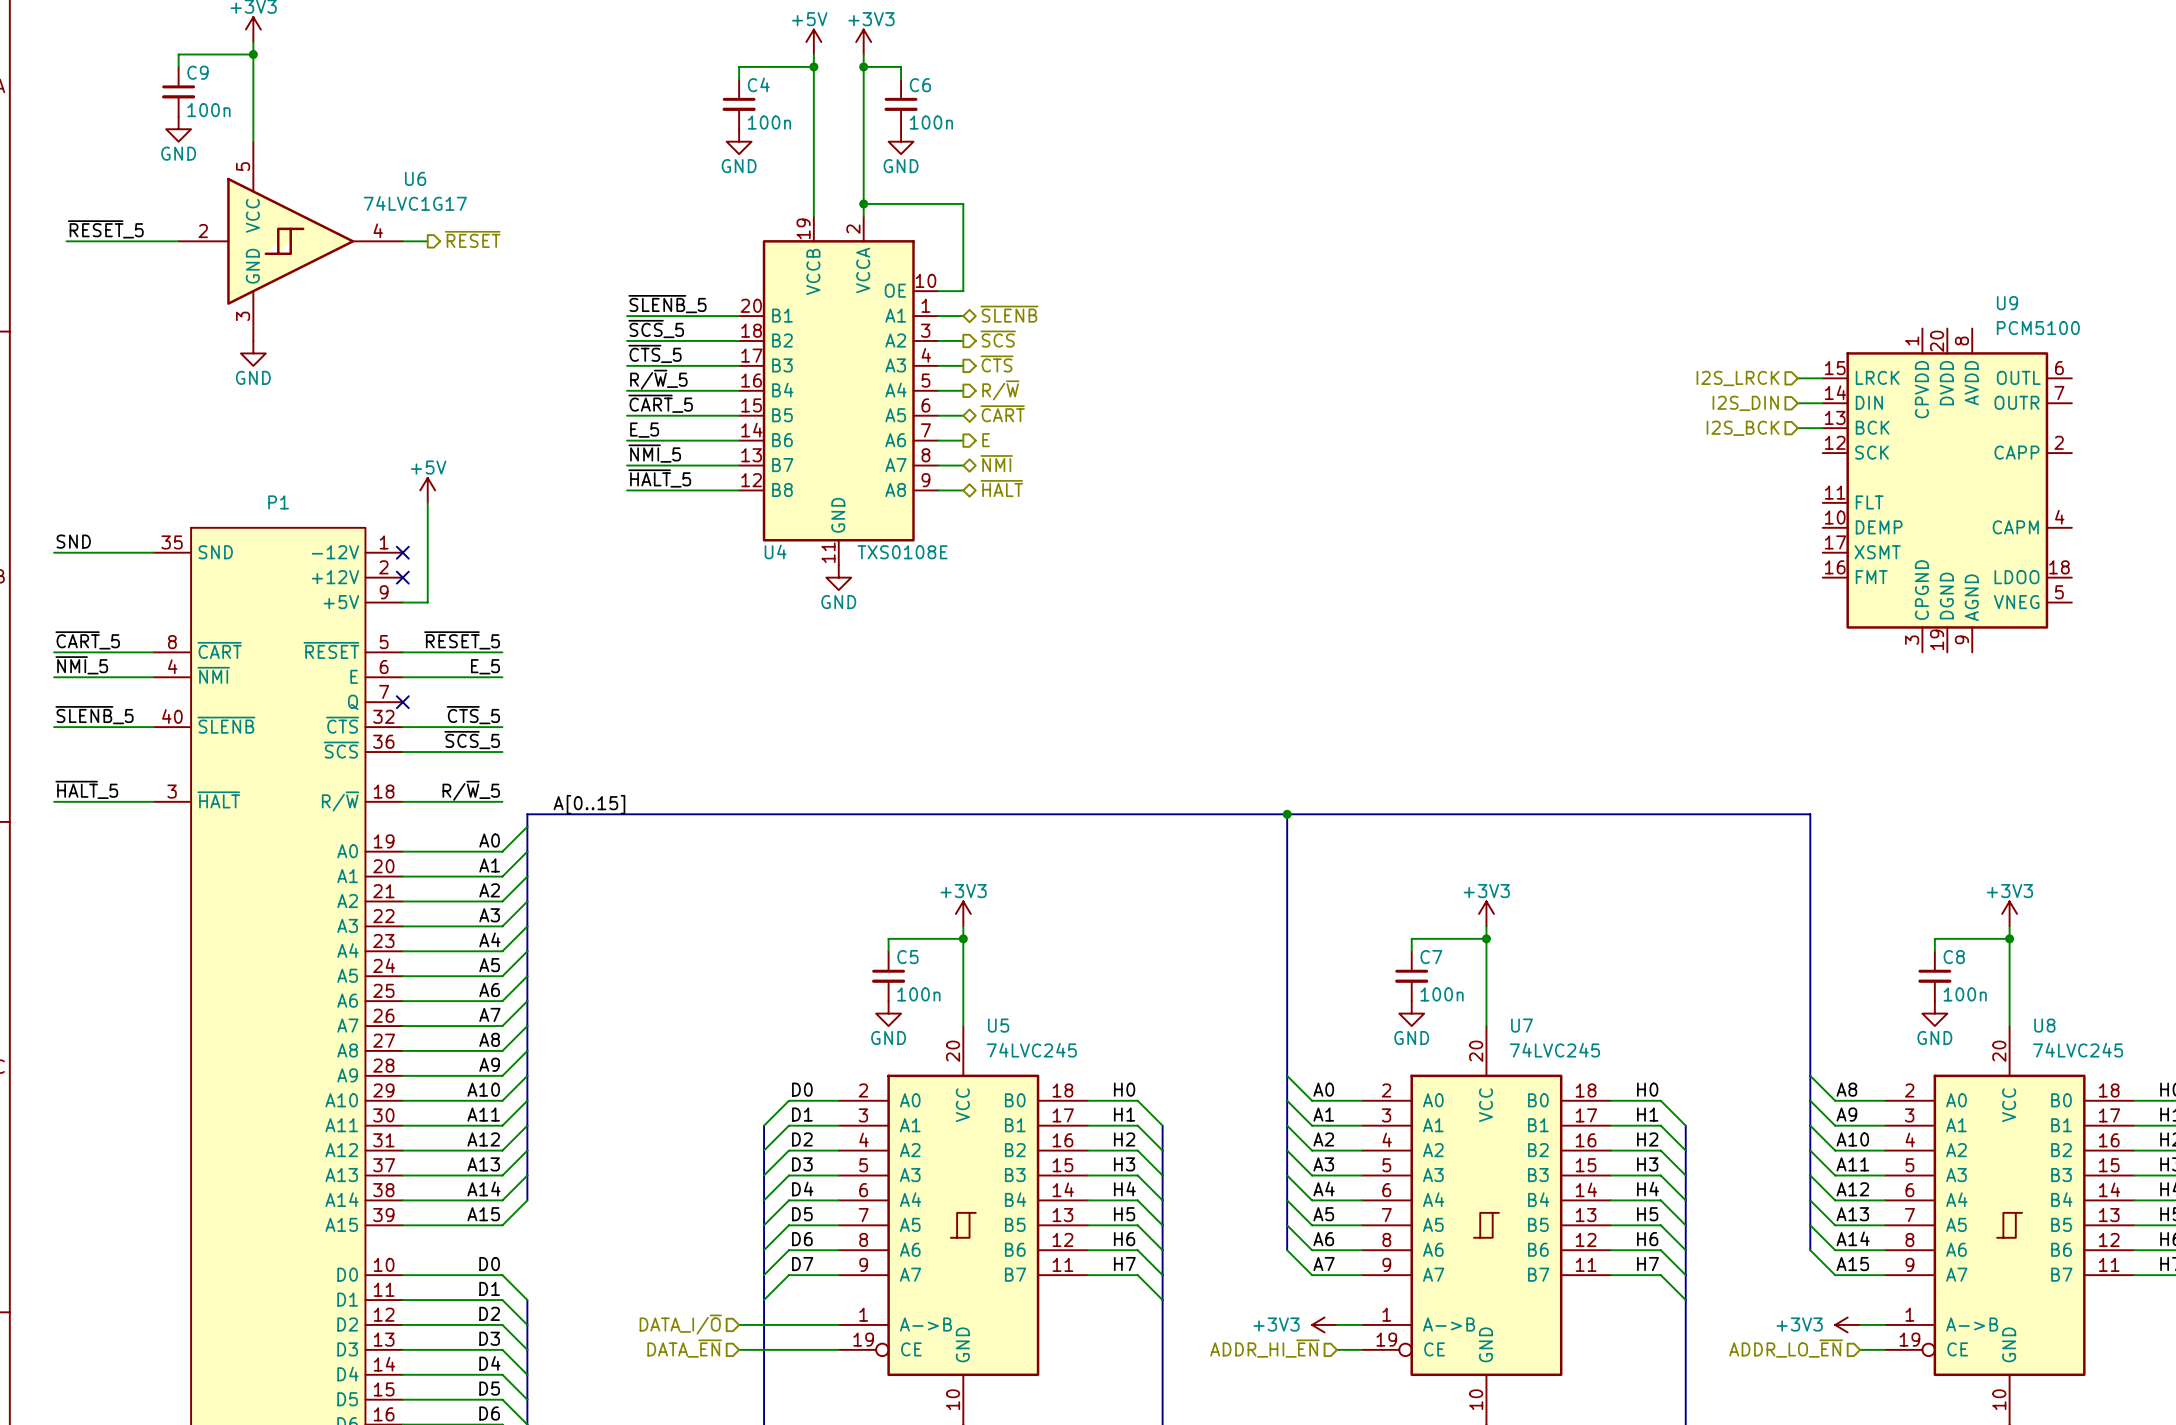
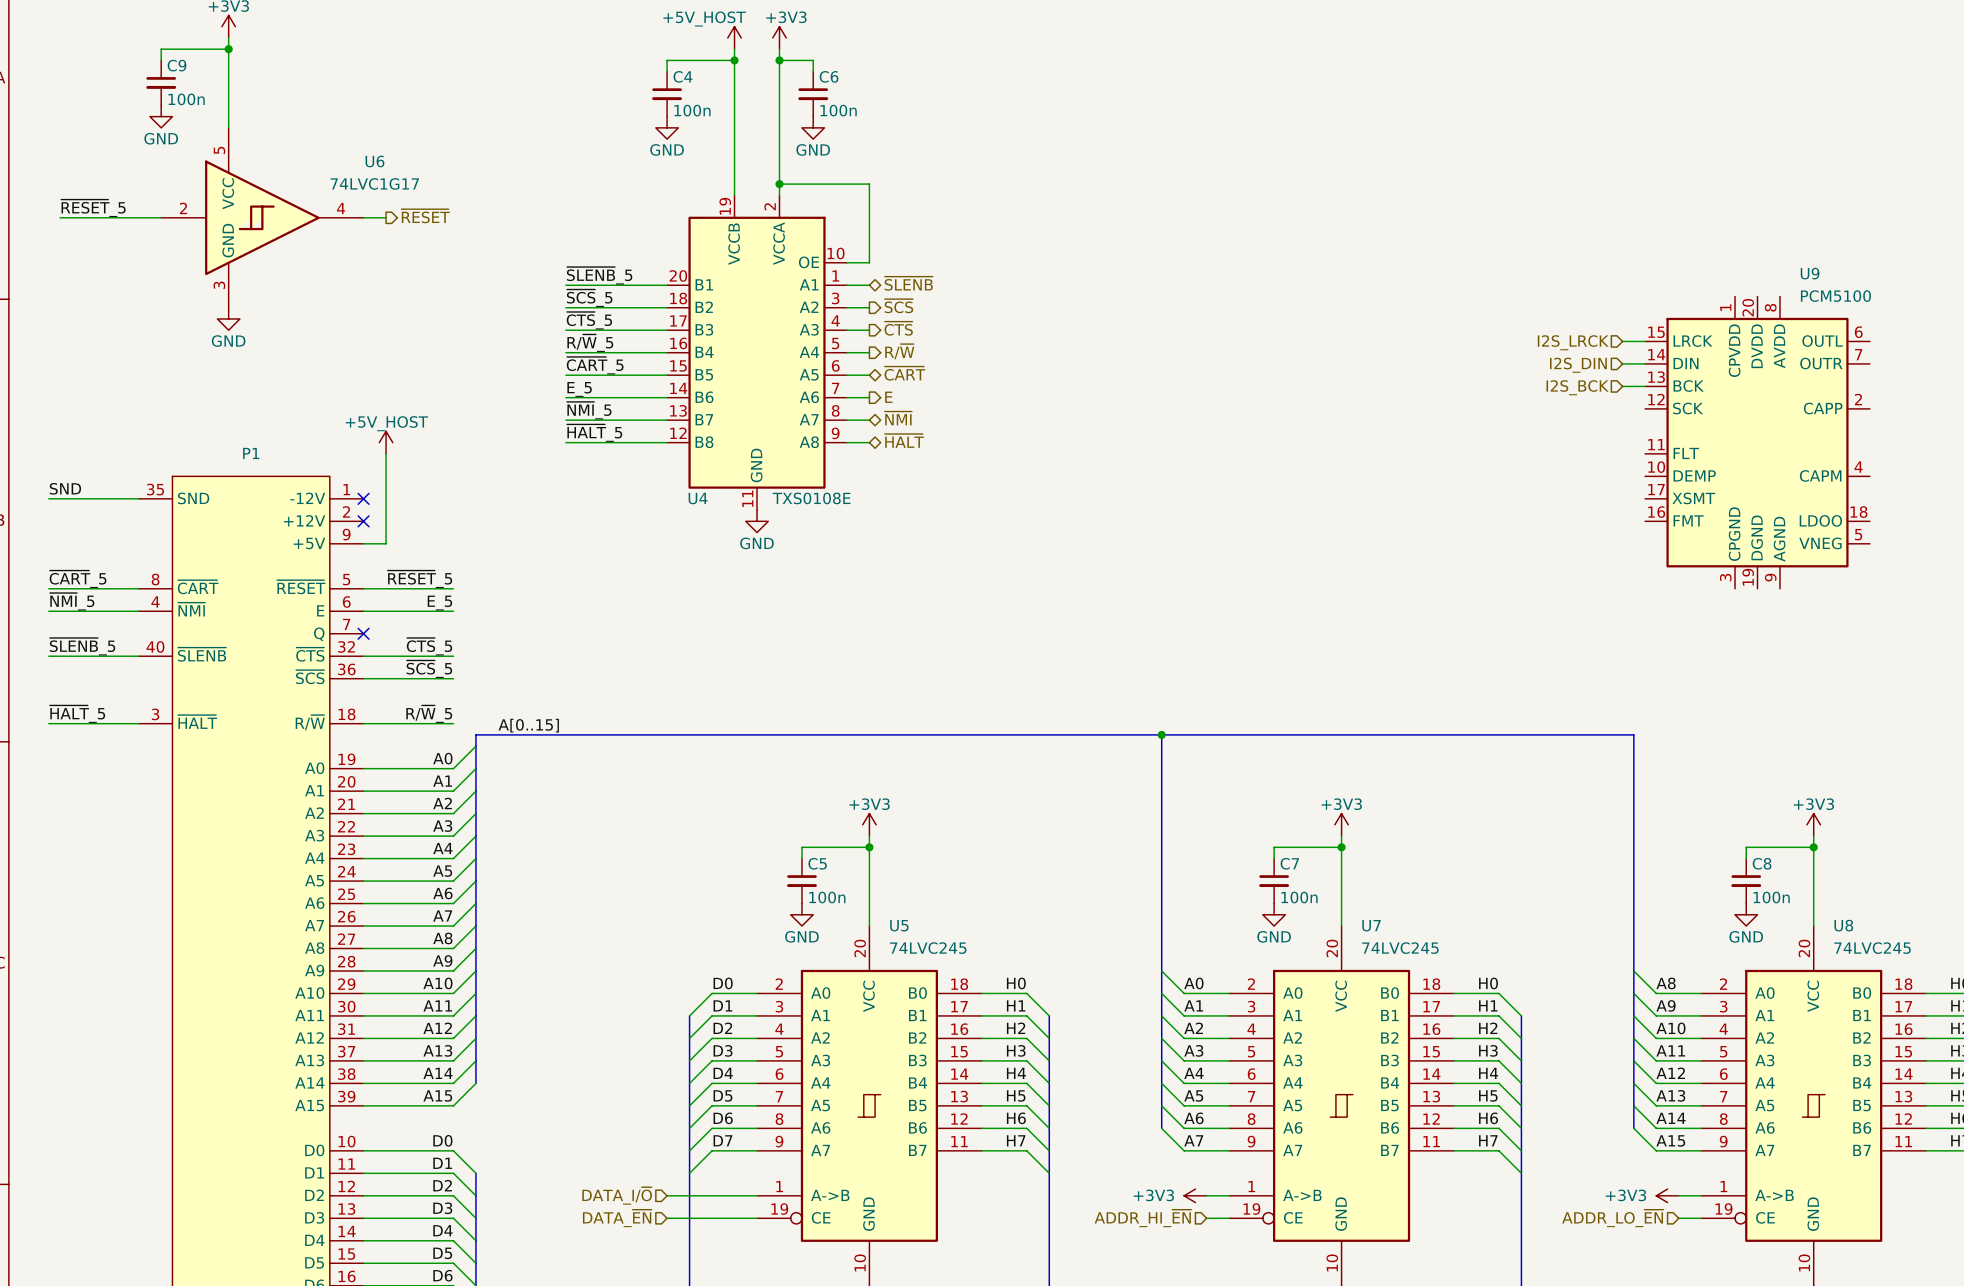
power symbol: +5V (813, 42) -> +5V_HOST (734, 37)
power symbol: +5V (427, 490) -> +5V_HOST (386, 442)

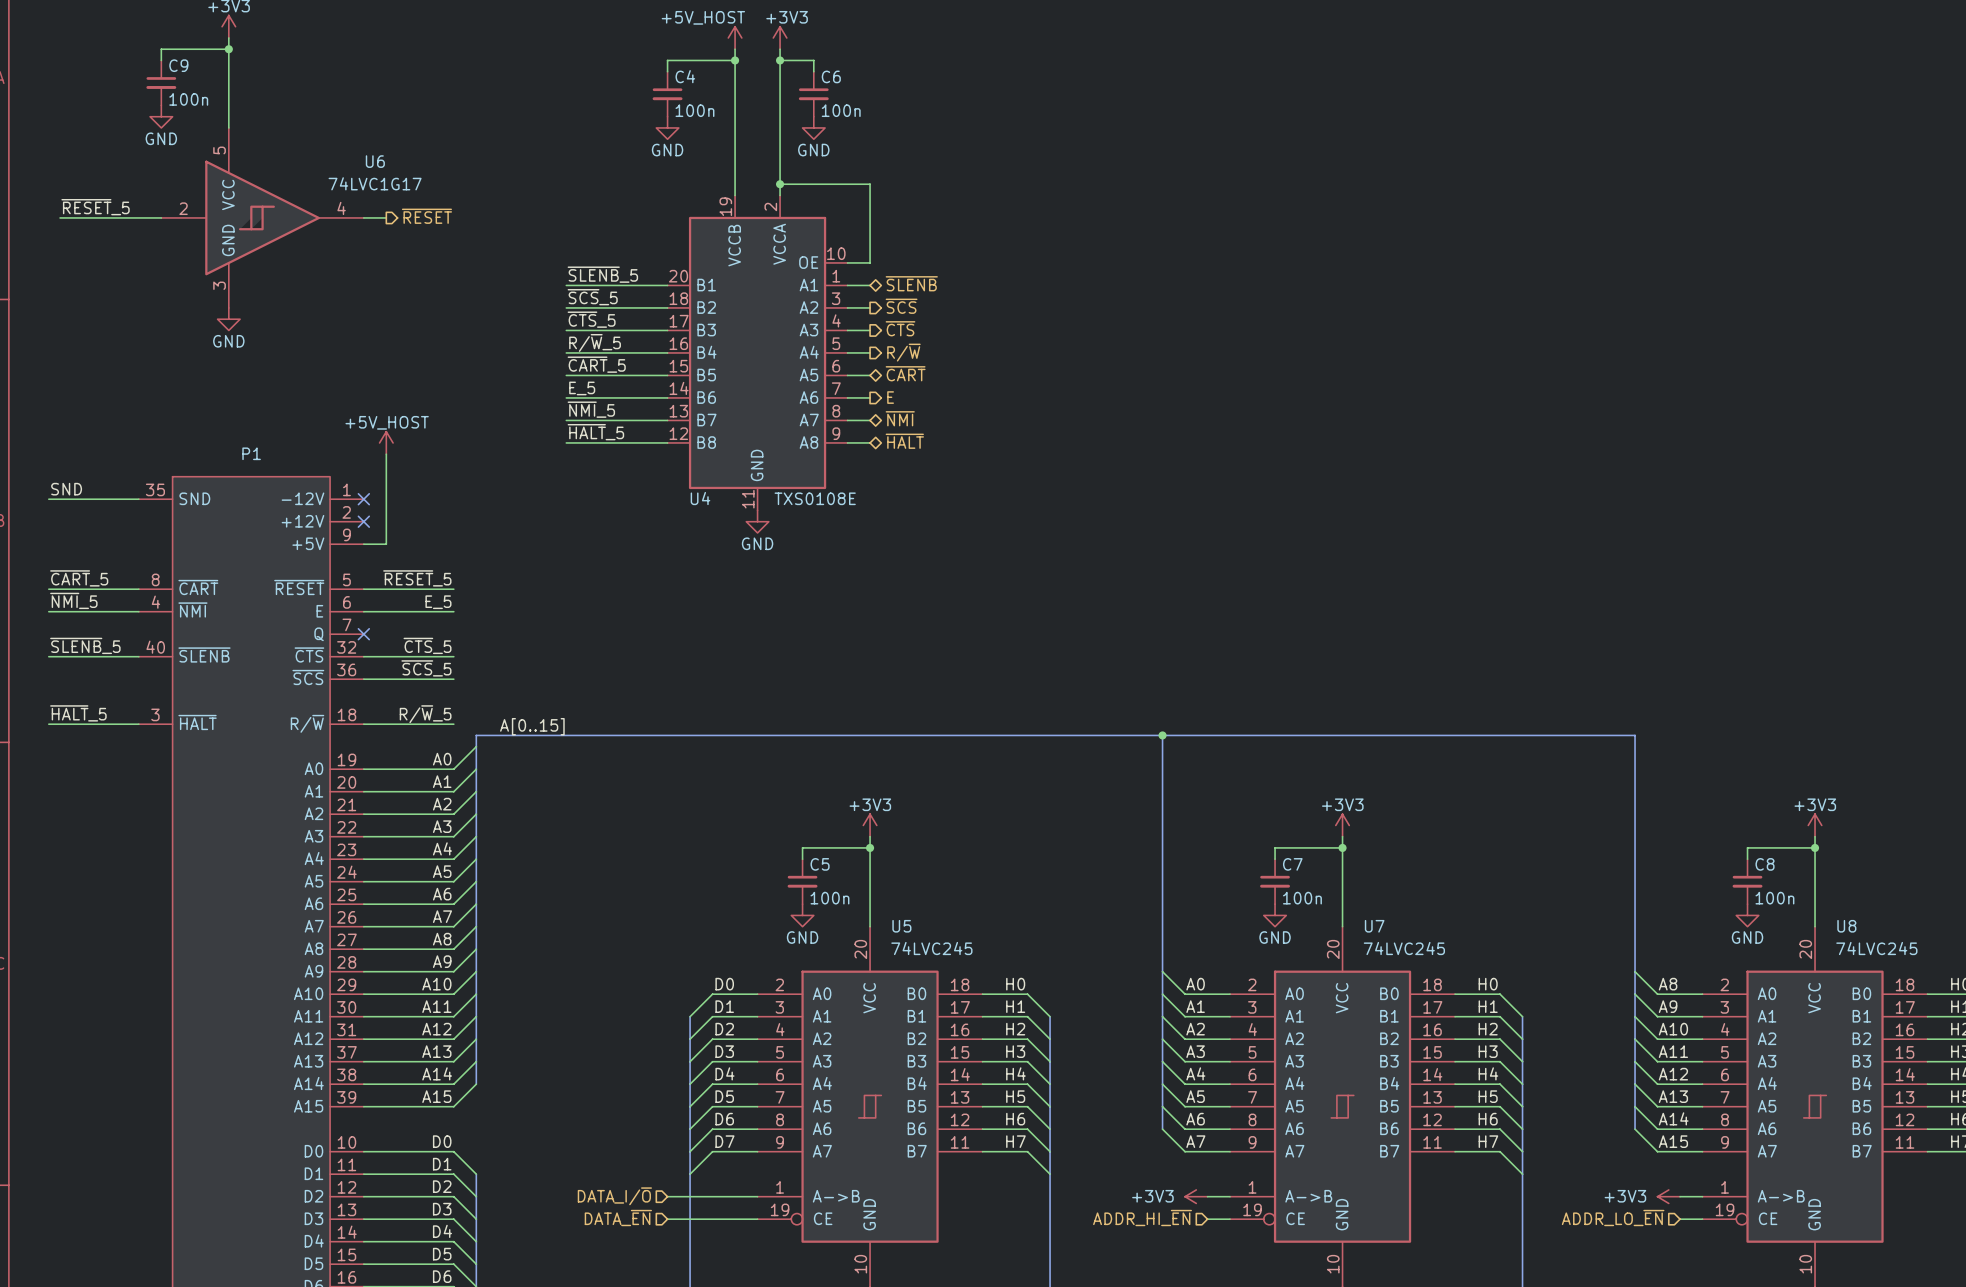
wire: (1622, 341) (1645, 341) -> none
hierarchical label: I2S_LRCK (1573, 342) -> none
wire: (1622, 363) (1645, 363) -> none
hierarchical label: I2S_DIN (1578, 365) -> none
wire: (1622, 386) (1645, 386) -> none
hierarchical label: I2S_BCK (1577, 387) -> none
U9: PCM5100 (1757, 442) -> none

